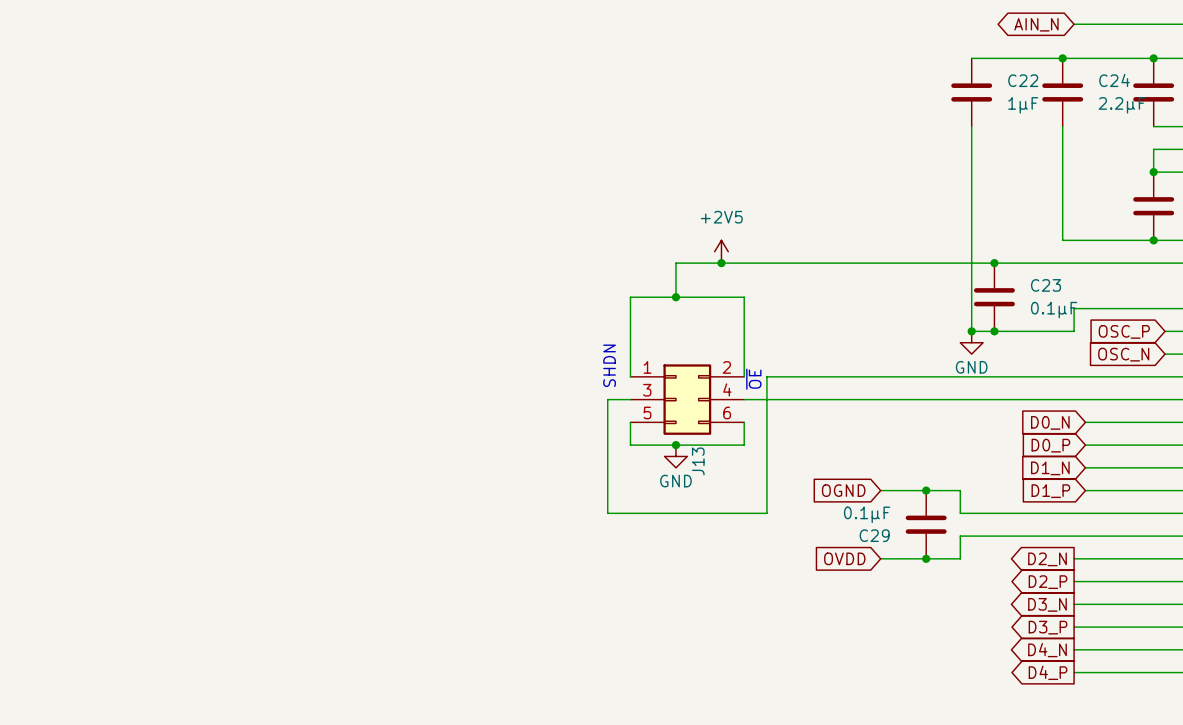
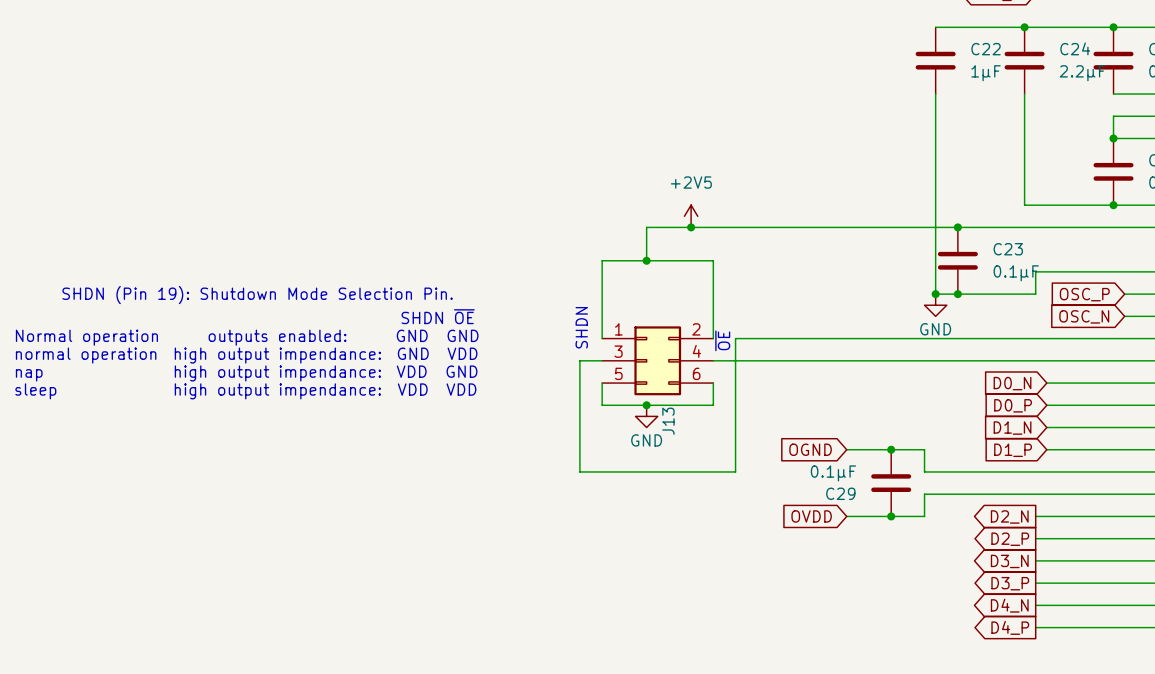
text: none -> SHDN (Pin 19): Shutdown Mode Selection Pin. (257, 295)
text: none -> SHDN ~{OE} (438, 316)
text: none -> GND GND (437, 335)
text: none -> Normal operation (86, 337)
text: none -> outputs enabled: (277, 337)
text: none -> GND VDD (437, 353)
text: none -> normal operation (86, 355)
text: none -> high output impendance: (277, 355)
text: none -> VDD GND (437, 371)
text: none -> high output impendance: (277, 373)
text: none -> nap (29, 375)
text: none -> VDD VDD (437, 389)
text: none -> sleep (35, 391)
text: none -> high output impendance: (277, 391)

